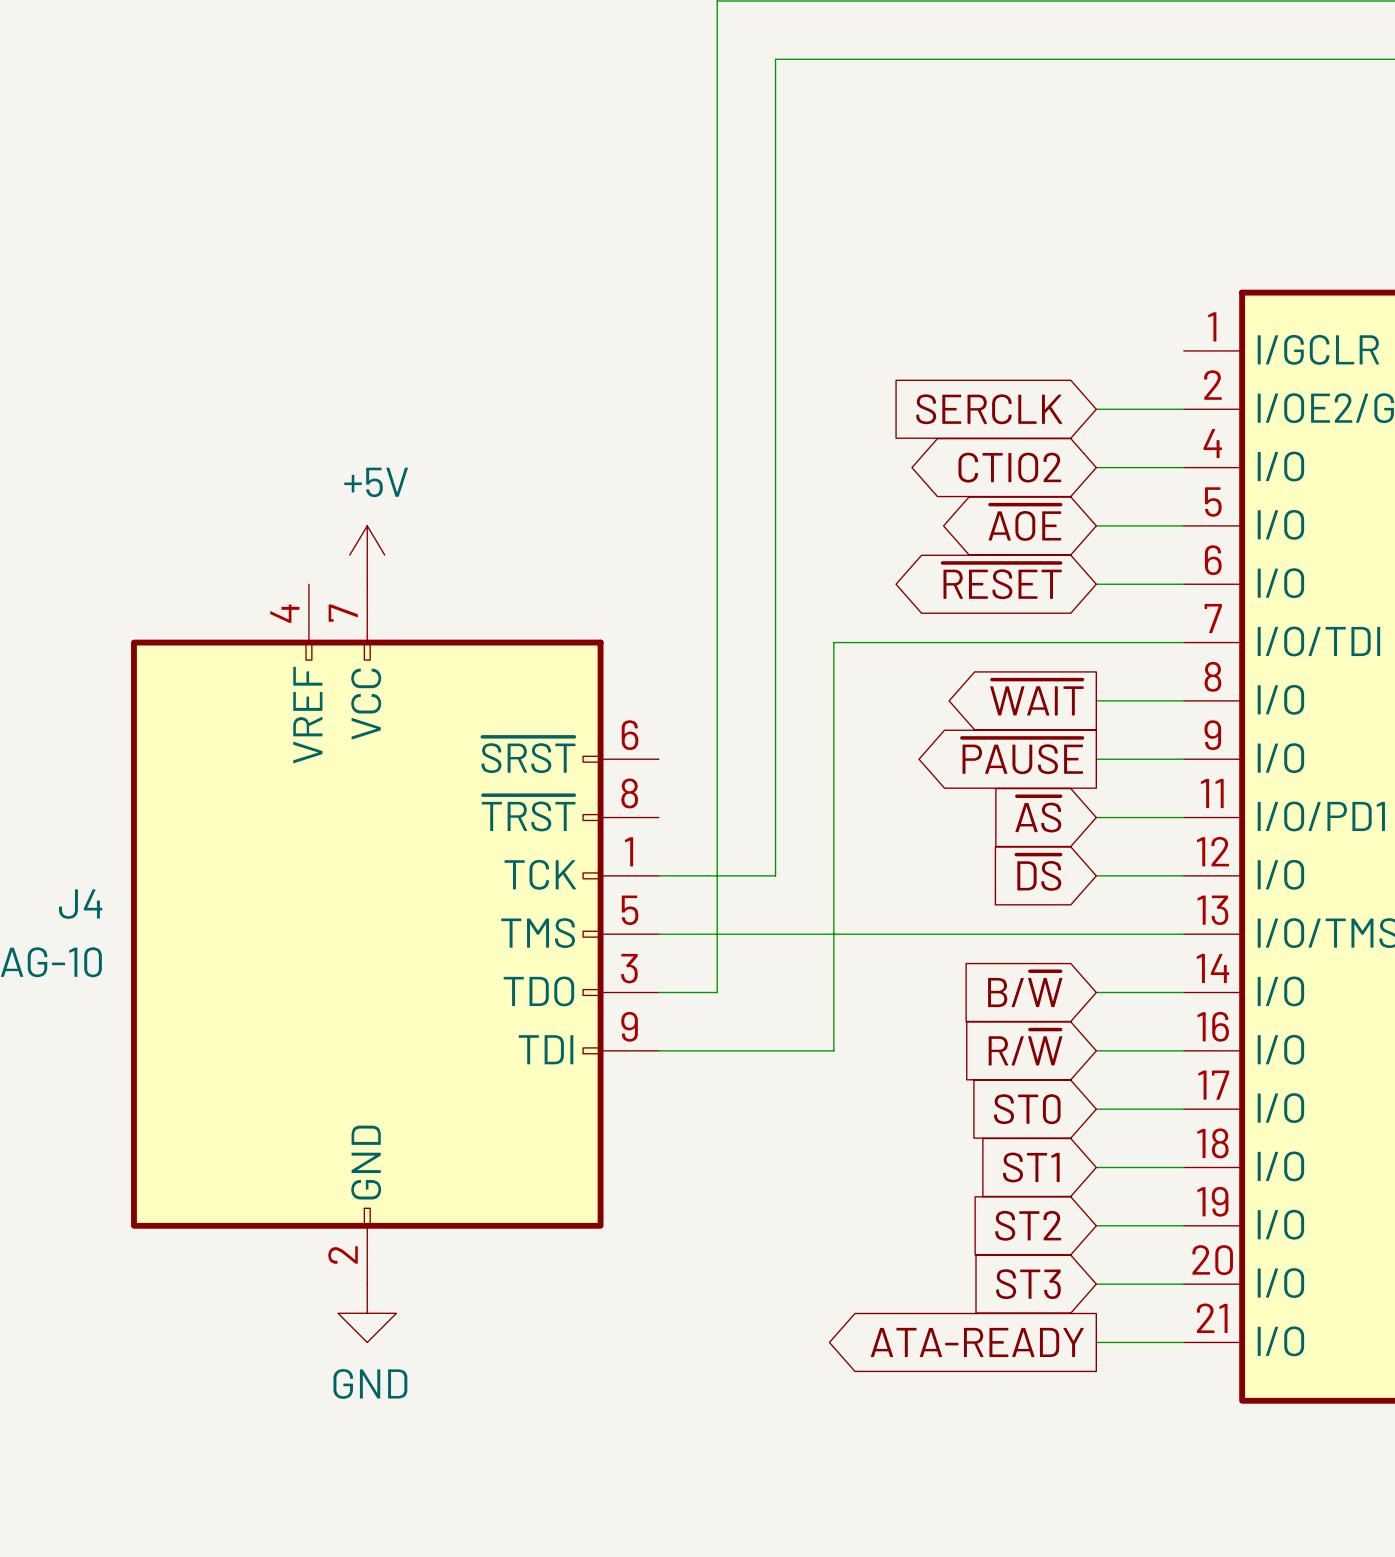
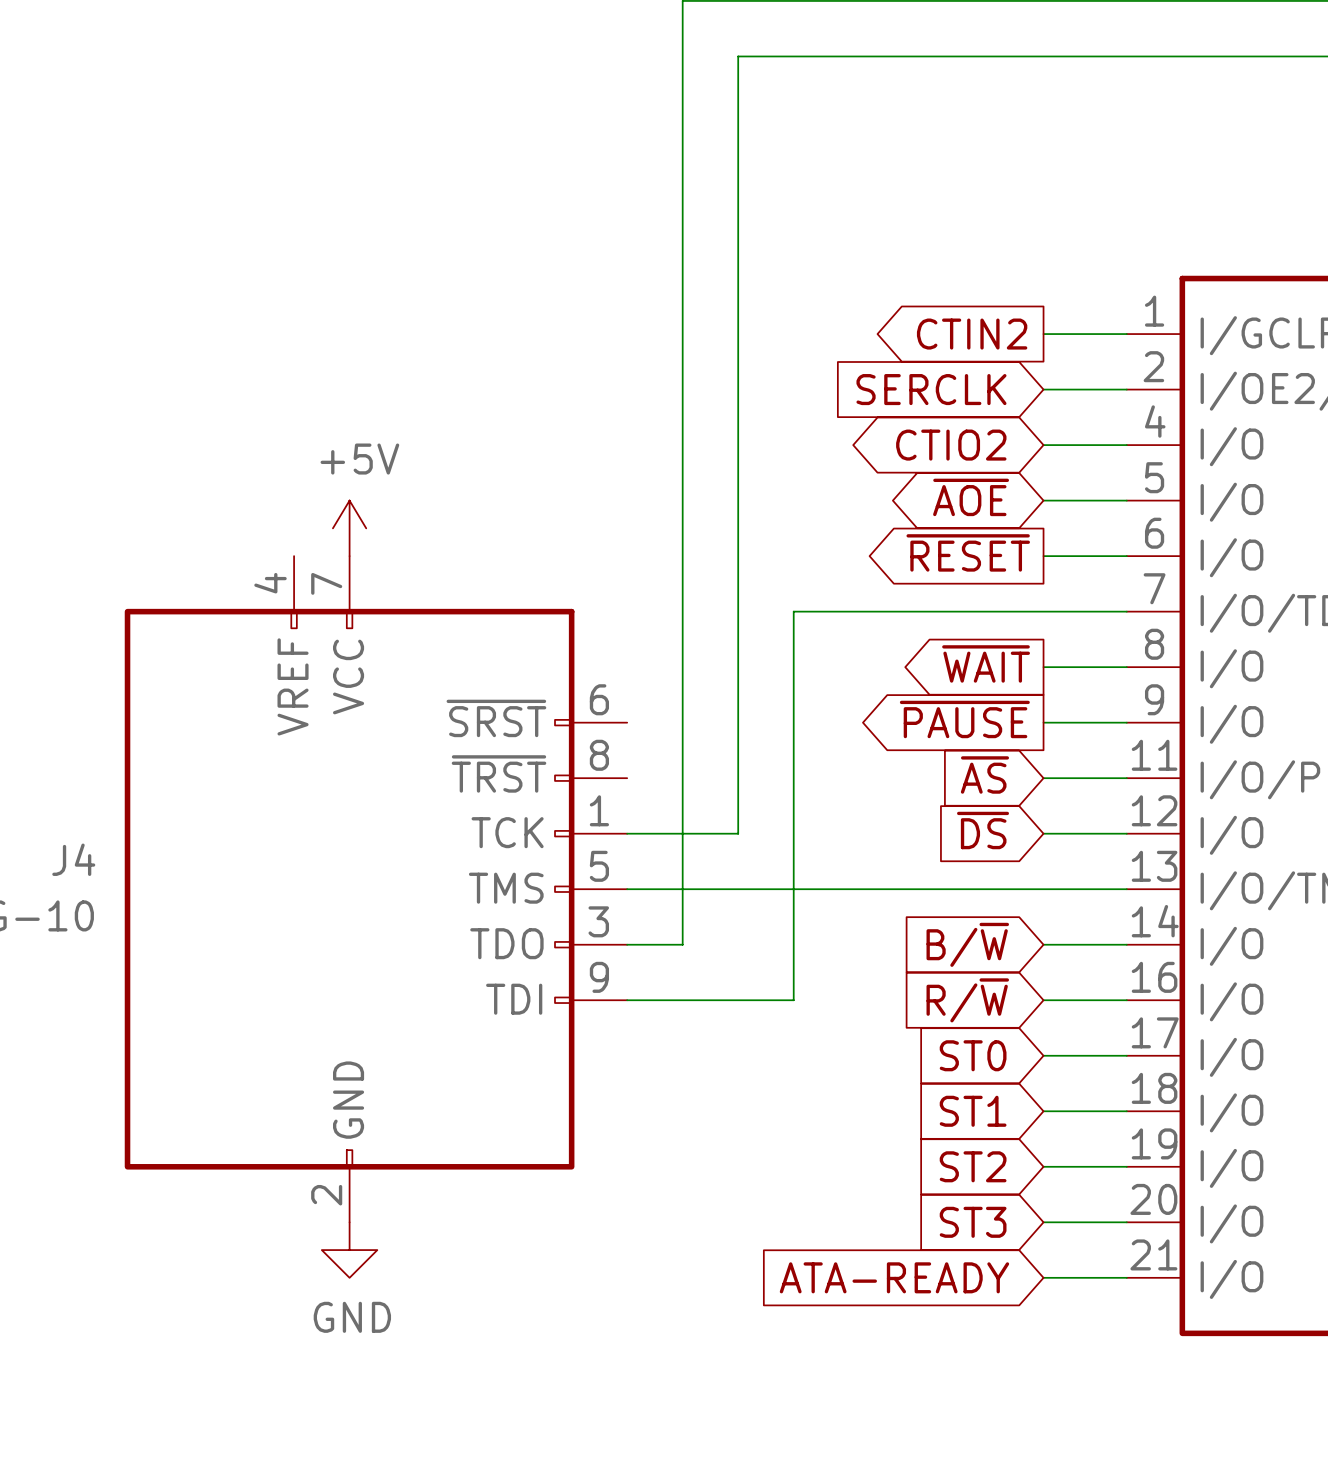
global label: none -> CTIN2 (972, 334)
wire: none -> (1043, 334) (1126, 334)
global label shape: bidirectional (1002, 581) -> output (968, 552)
global label shape: output (977, 1342) -> input (894, 1277)

